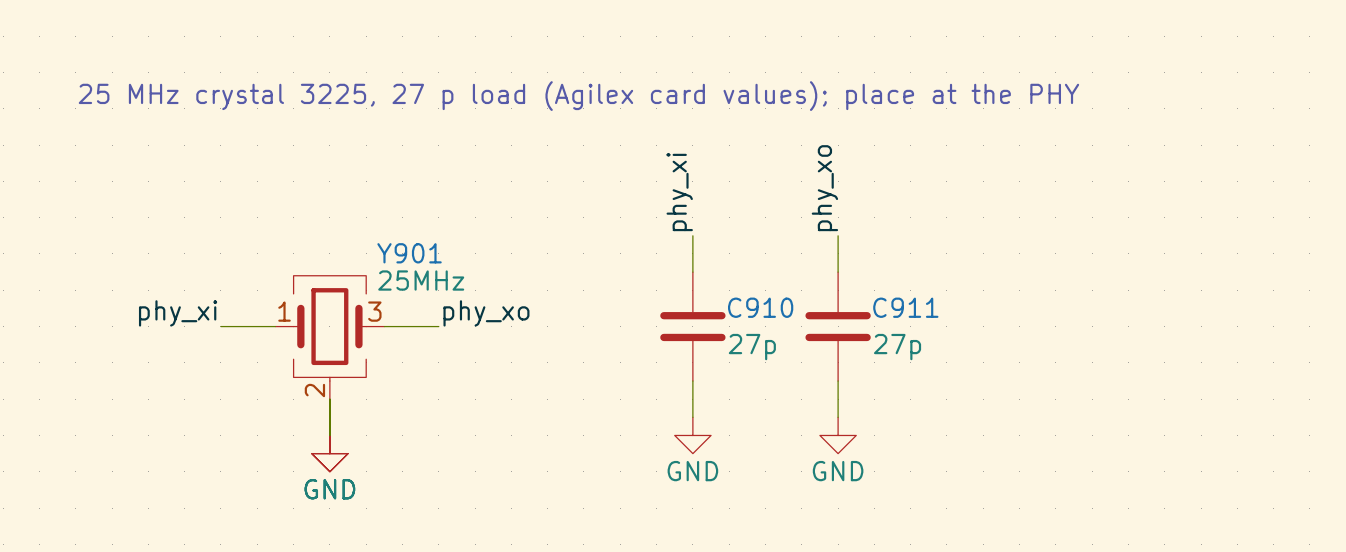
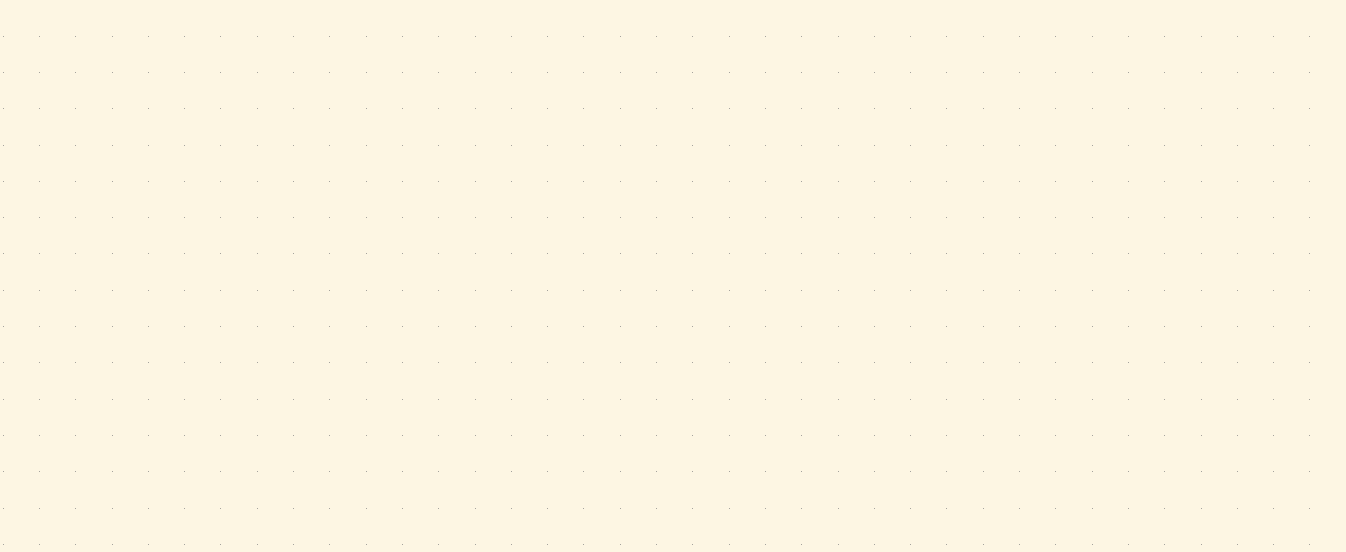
text: 25 MHz crystal 3225, 27 p load (Agilex card values); place at the PHY (578, 96) -> none
label: phy_xo (824, 188) -> none
label: phy_xi (679, 192) -> none
wire: (692, 235) (692, 272) -> none
wire: (838, 235) (838, 272) -> none
label: phy_xi (178, 313) -> none
label: phy_xo (486, 313) -> none
wire: (220, 326) (275, 326) -> none
wire: (384, 326) (438, 326) -> none
C910: 27p (692, 326) -> none
C911: 27p (838, 326) -> none
Y901: 25MHz (329, 337) -> none
wire: (692, 381) (692, 417) -> none
wire: (838, 381) (838, 417) -> none
wire: (329, 399) (329, 435) -> none
power symbol: GND (692, 435) -> none
power symbol: GND (838, 435) -> none
power symbol: GND (329, 453) -> none

